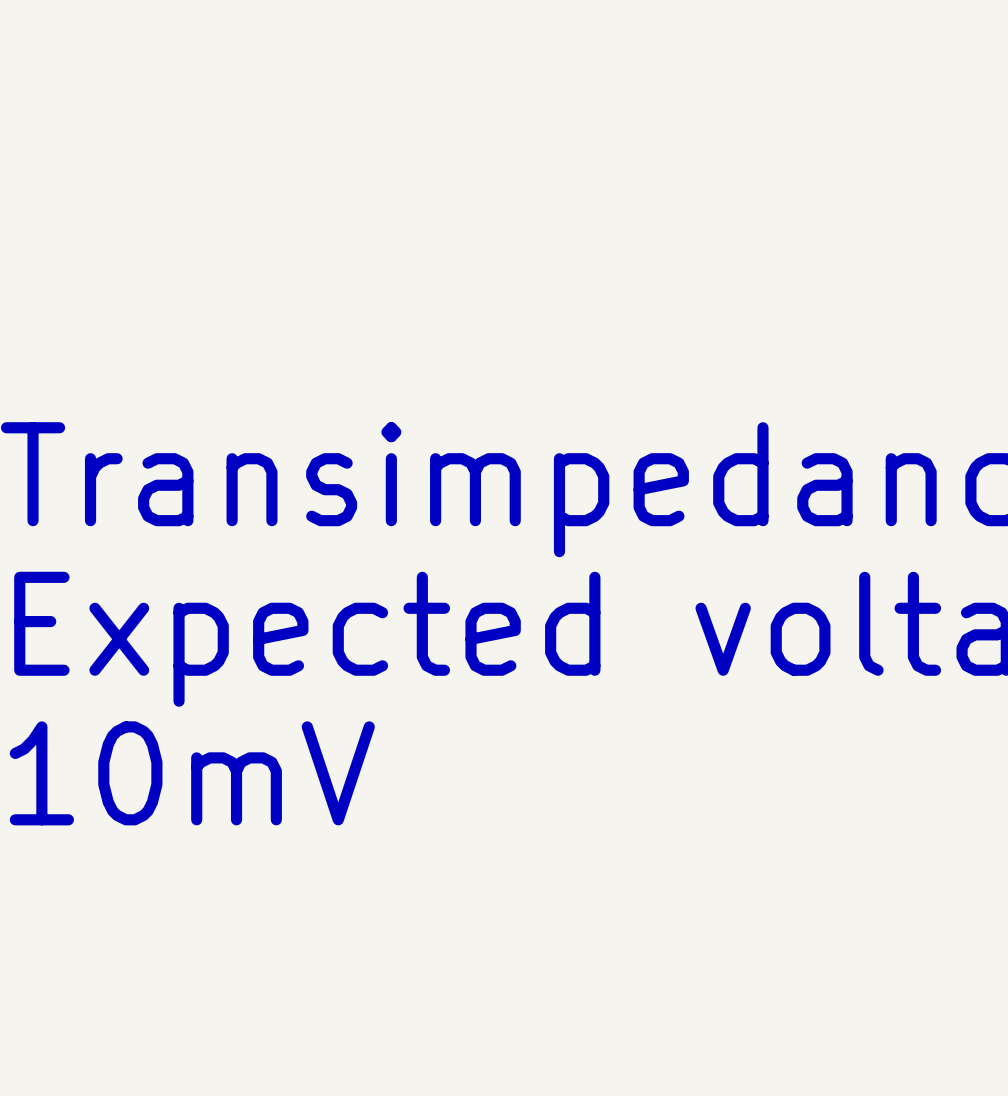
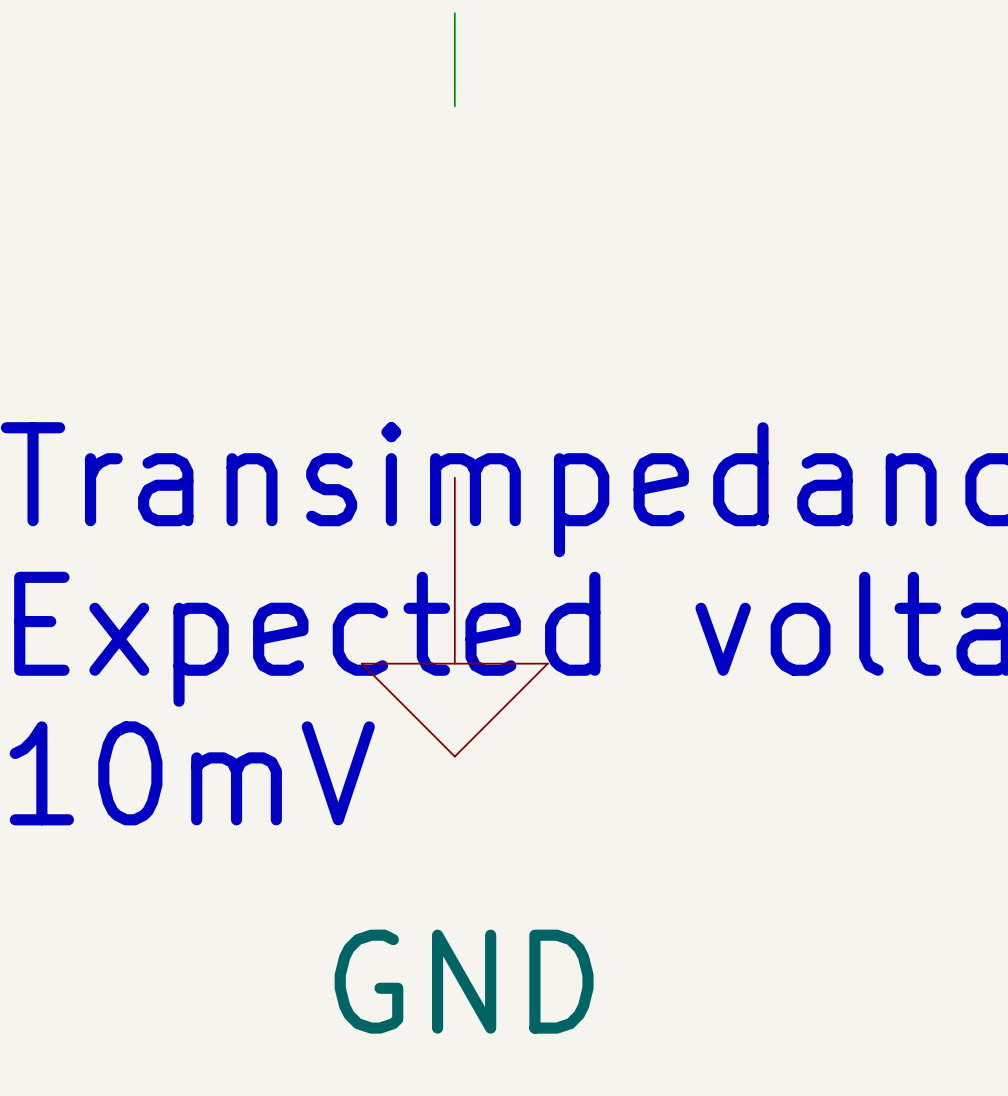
wire: none -> (454, 13) (454, 106)
power symbol: none -> GND (454, 617)

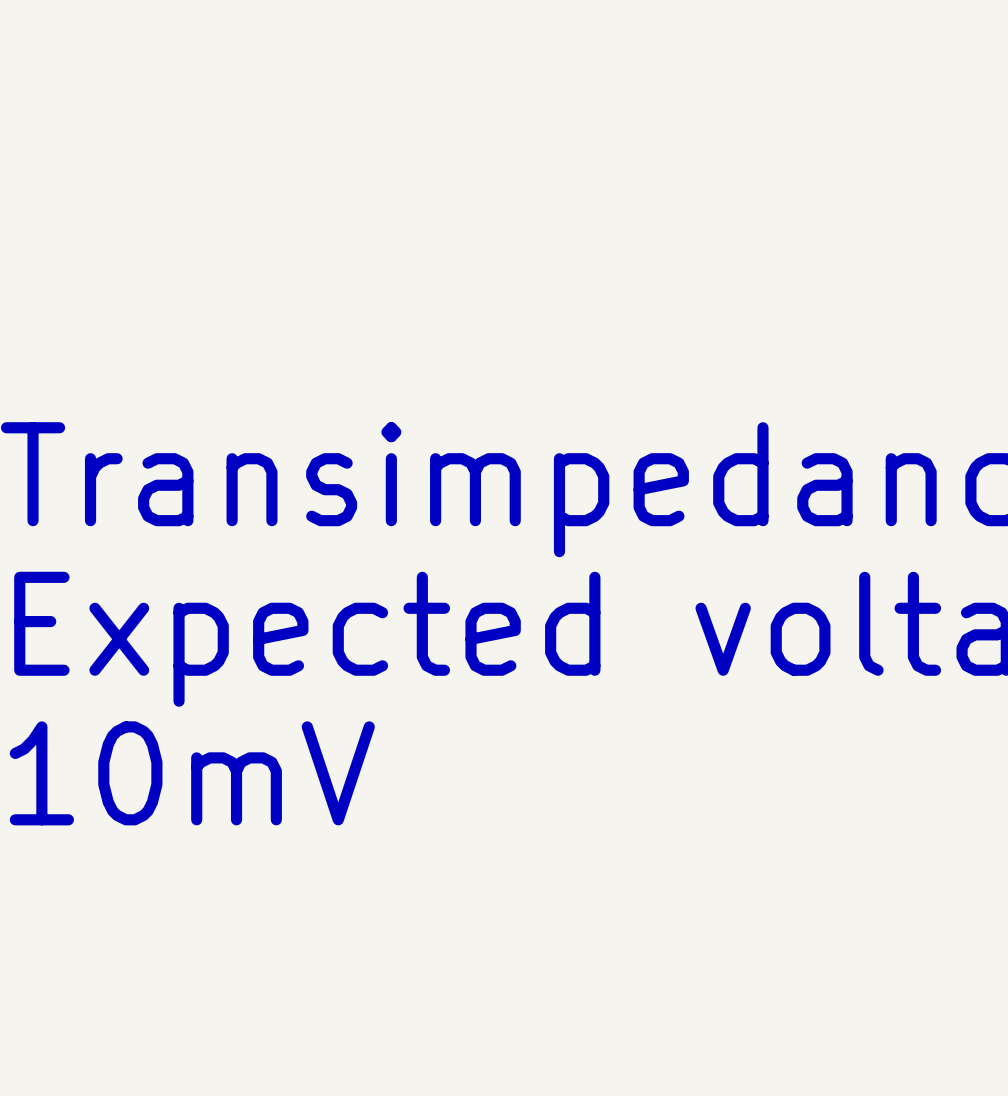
wire: (454, 13) (454, 106) -> none
power symbol: GND (454, 617) -> none

